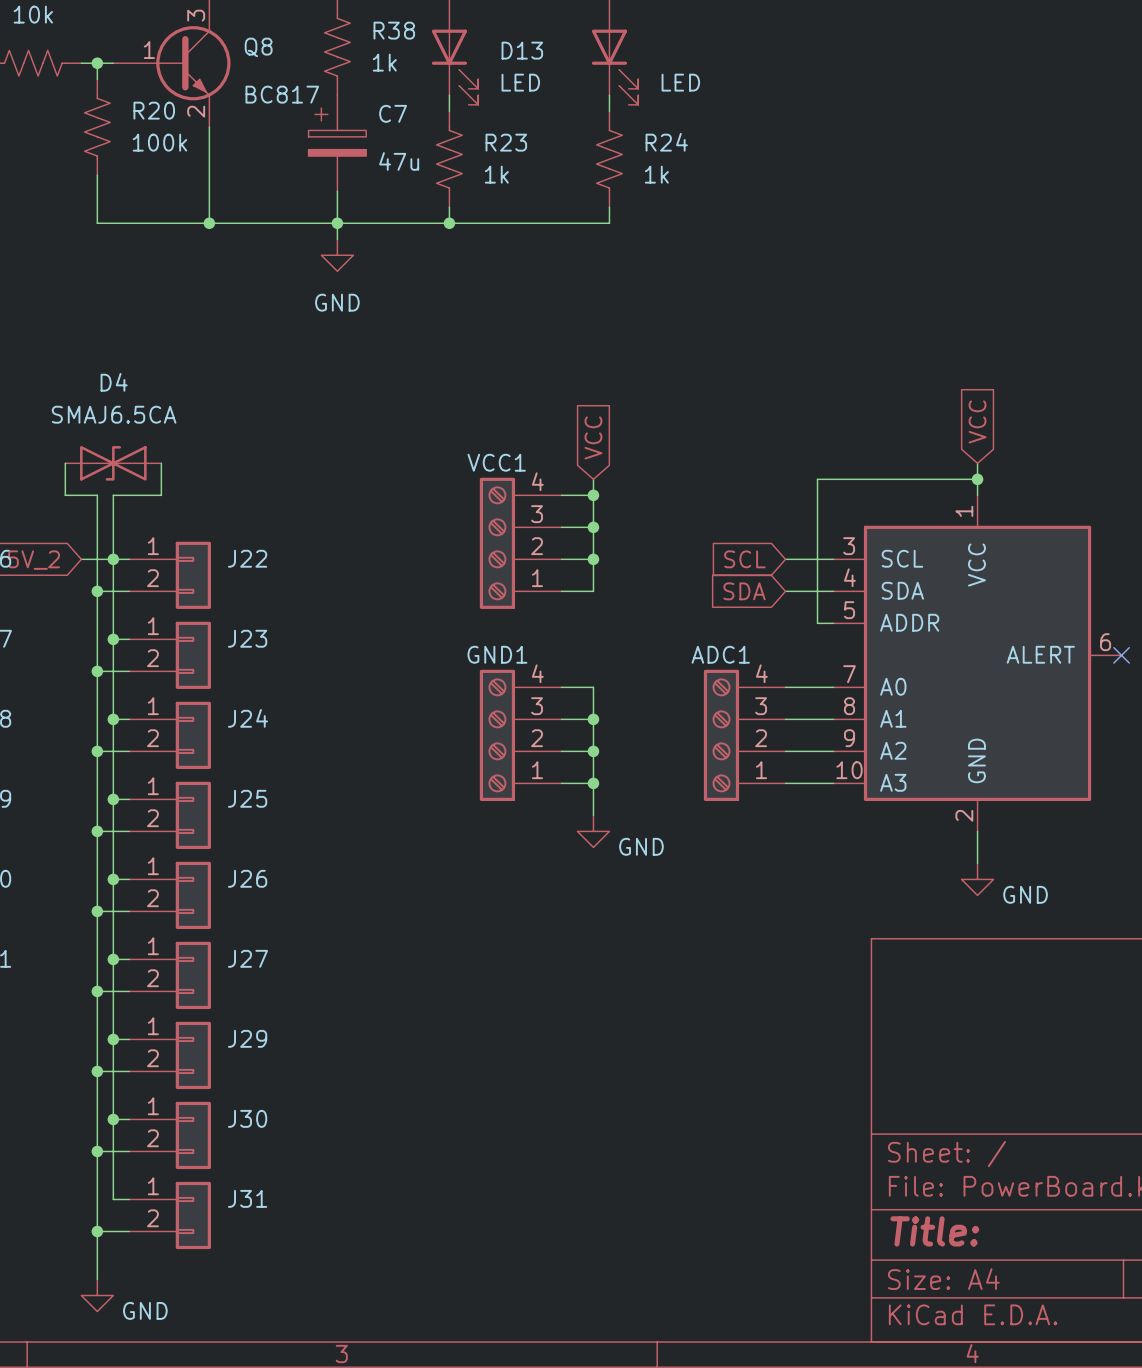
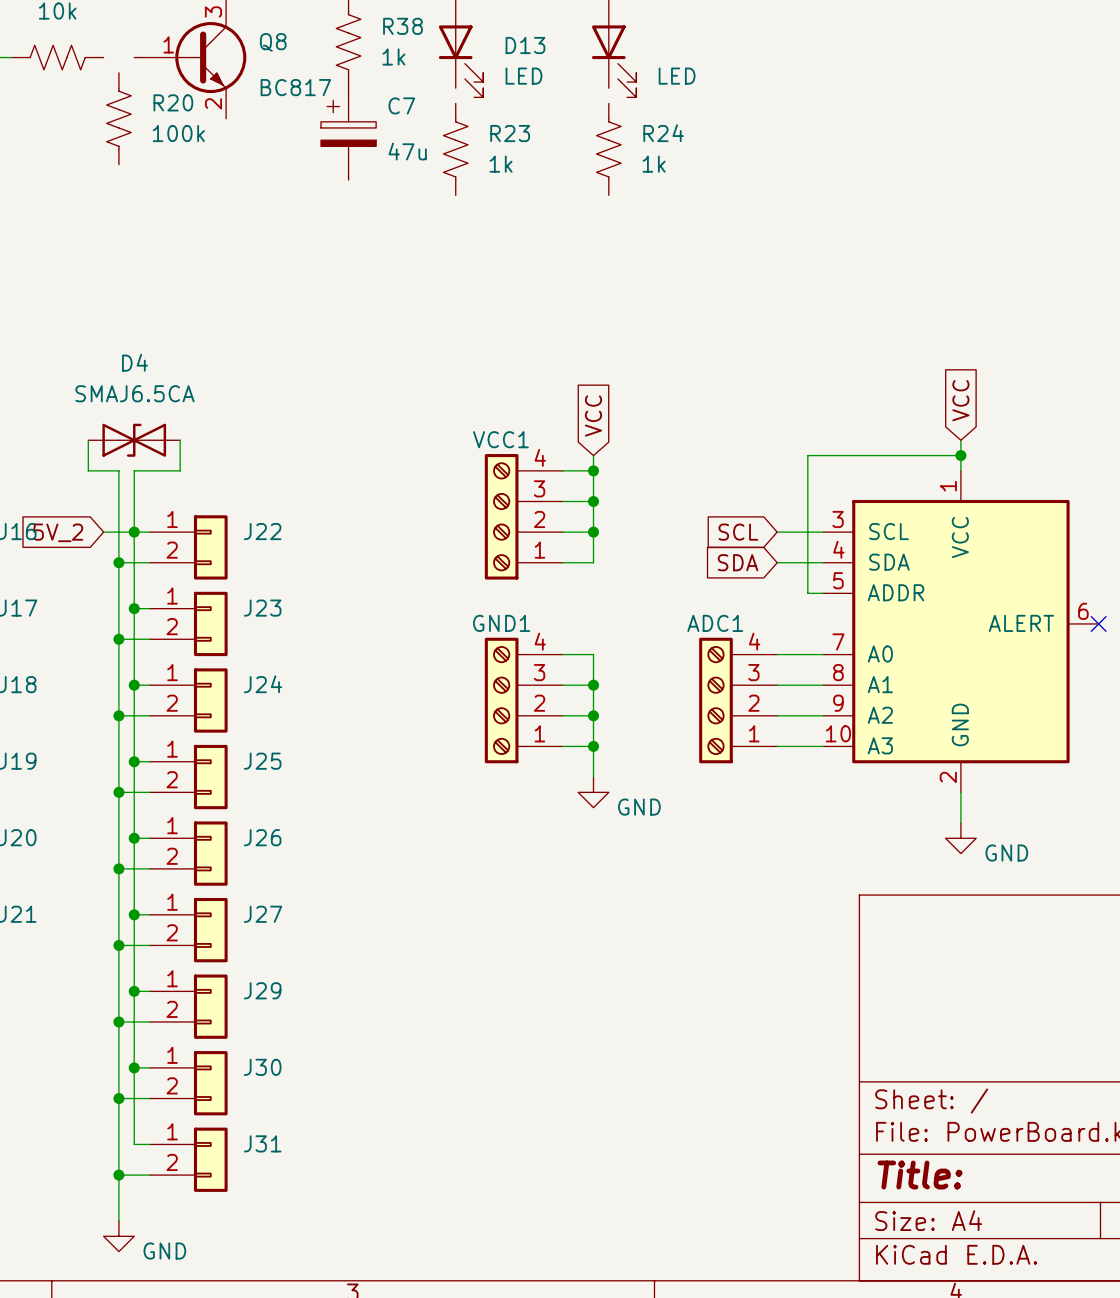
wire: (81, 63) (113, 63) -> none
wire: (97, 63) (97, 79) -> none
junction: (97, 63) -> none
wire: (449, 95) (449, 111) -> none
wire: (609, 95) (609, 111) -> none
wire: (209, 127) (209, 223) -> none
wire: (97, 175) (97, 223) (609, 223) (609, 207) -> none
wire: (337, 191) (337, 239) -> none
wire: (449, 207) (449, 223) -> none
junction: (209, 223) -> none
junction: (337, 223) -> none
junction: (449, 223) -> none
power symbol: GND (337, 255) -> none

